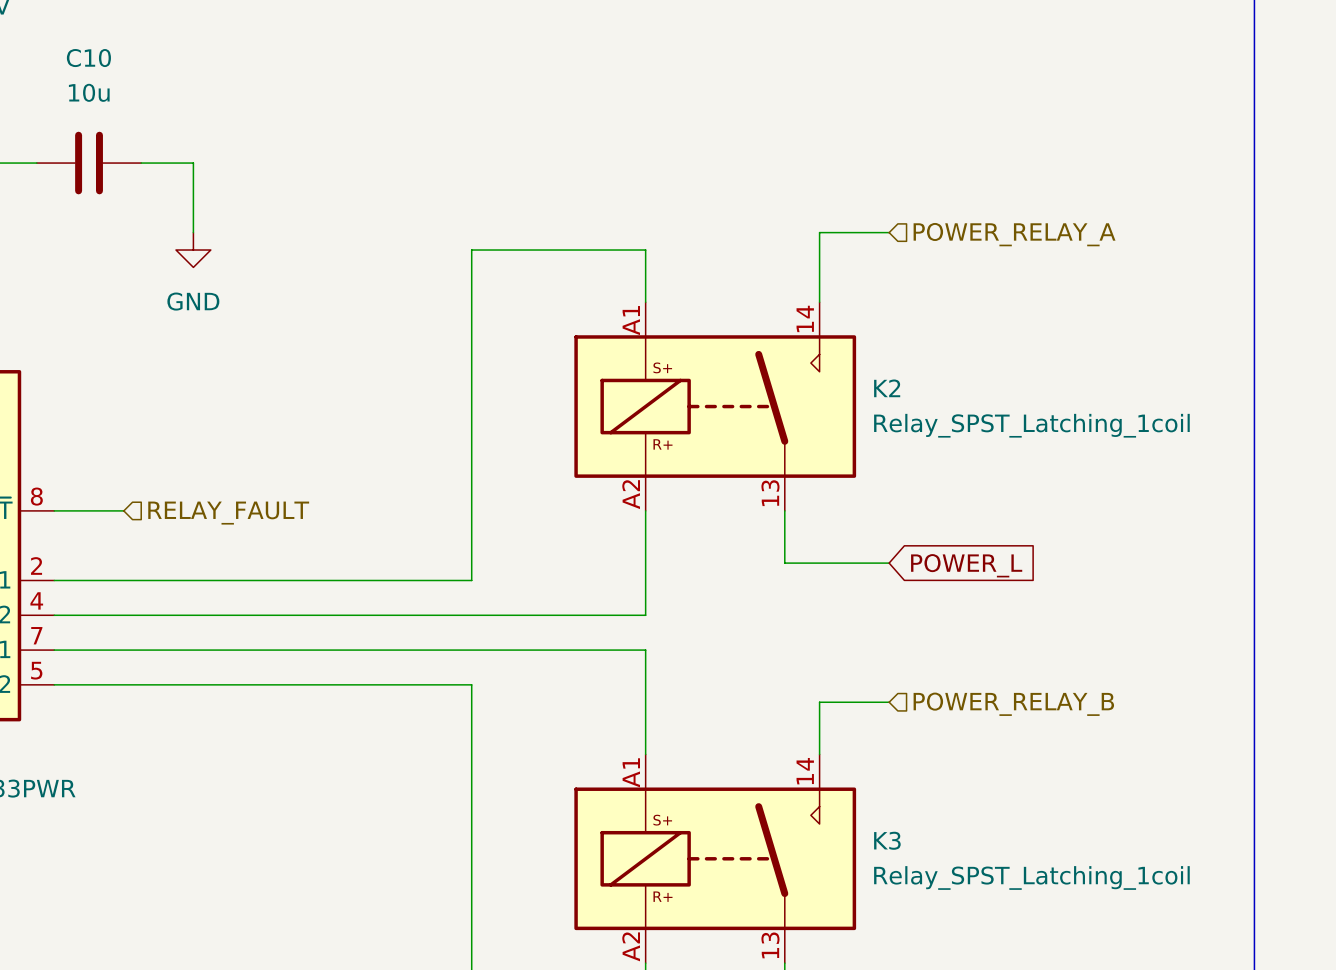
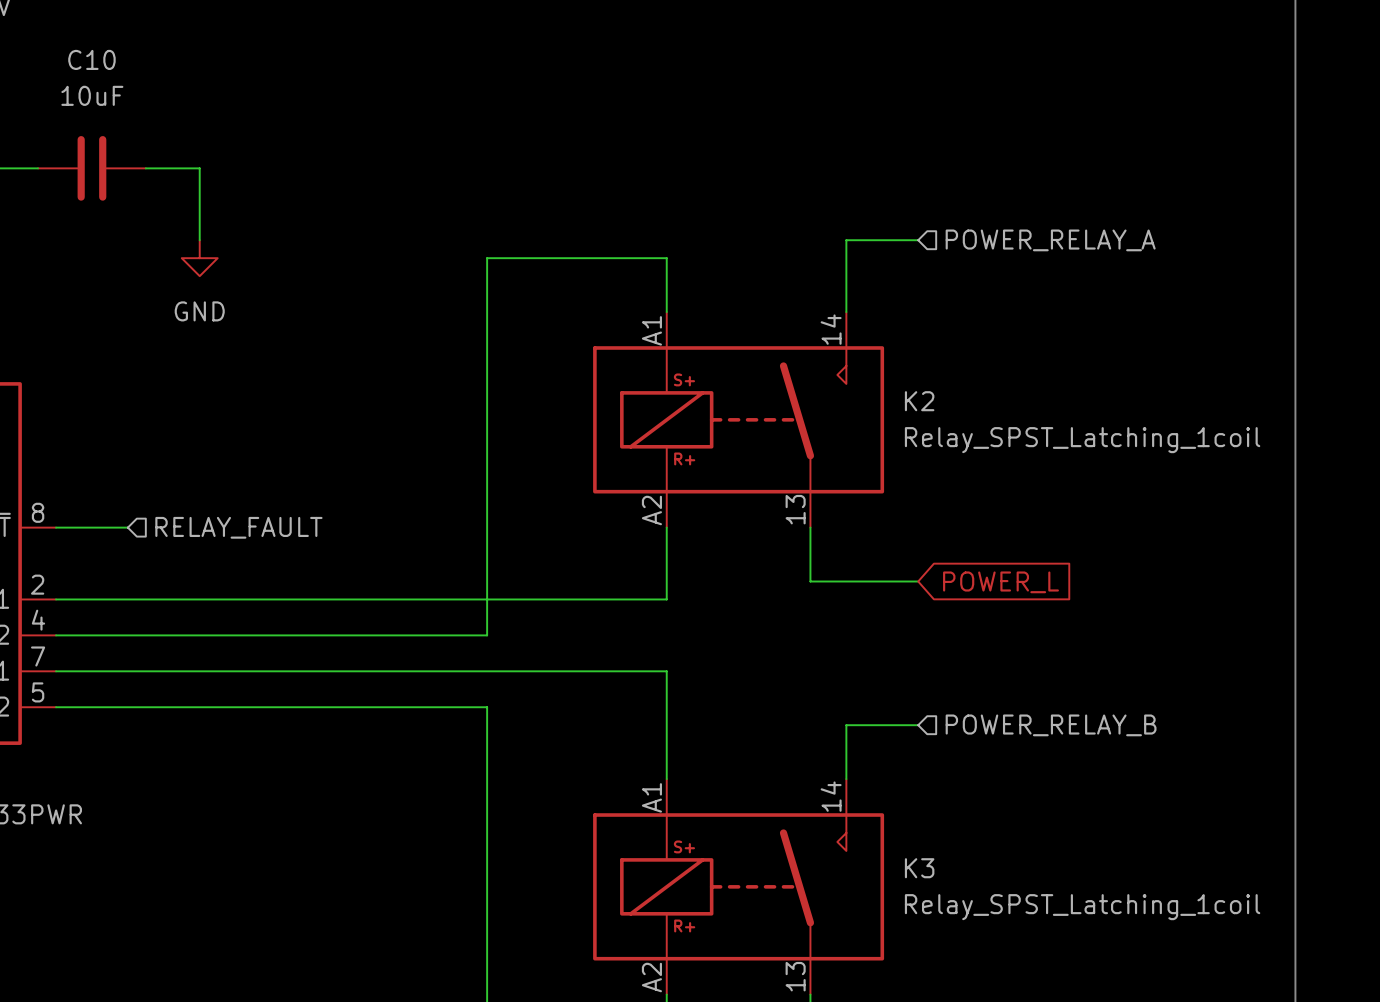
C10 value: 10u (89, 92) -> 10uF (92, 95)
wire: (645, 580) (645, 615) (471, 615) -> (666, 599) (487, 599) (487, 635)

